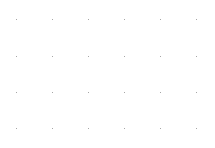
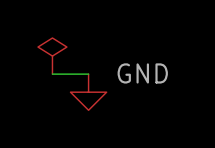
power symbol: none -> (52, 56)
wire: none -> (52, 74) (88, 74)
power symbol: none -> GND (88, 92)

